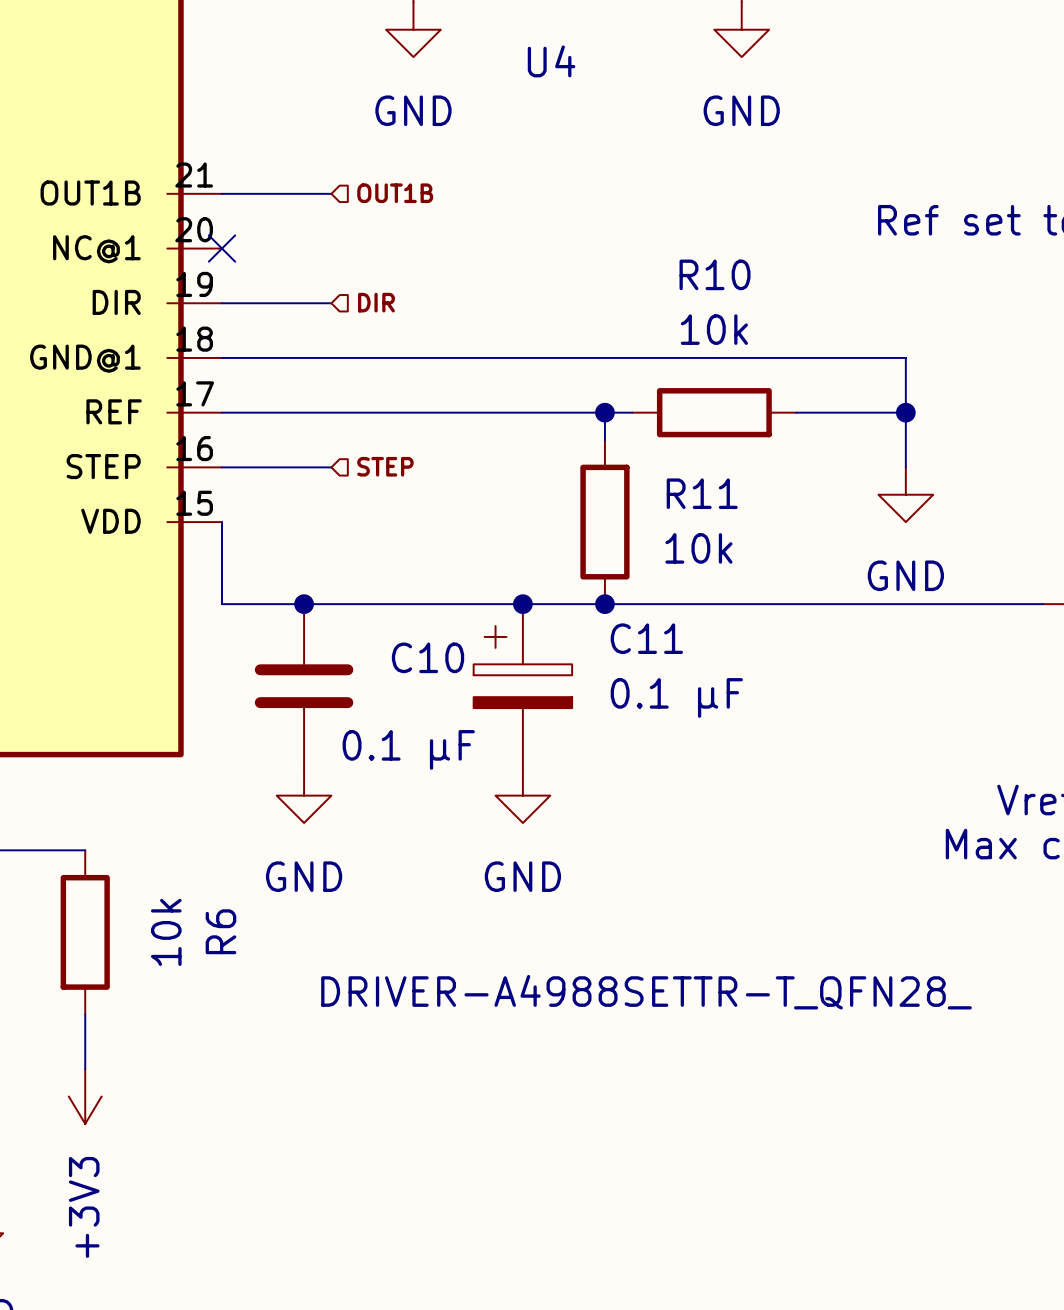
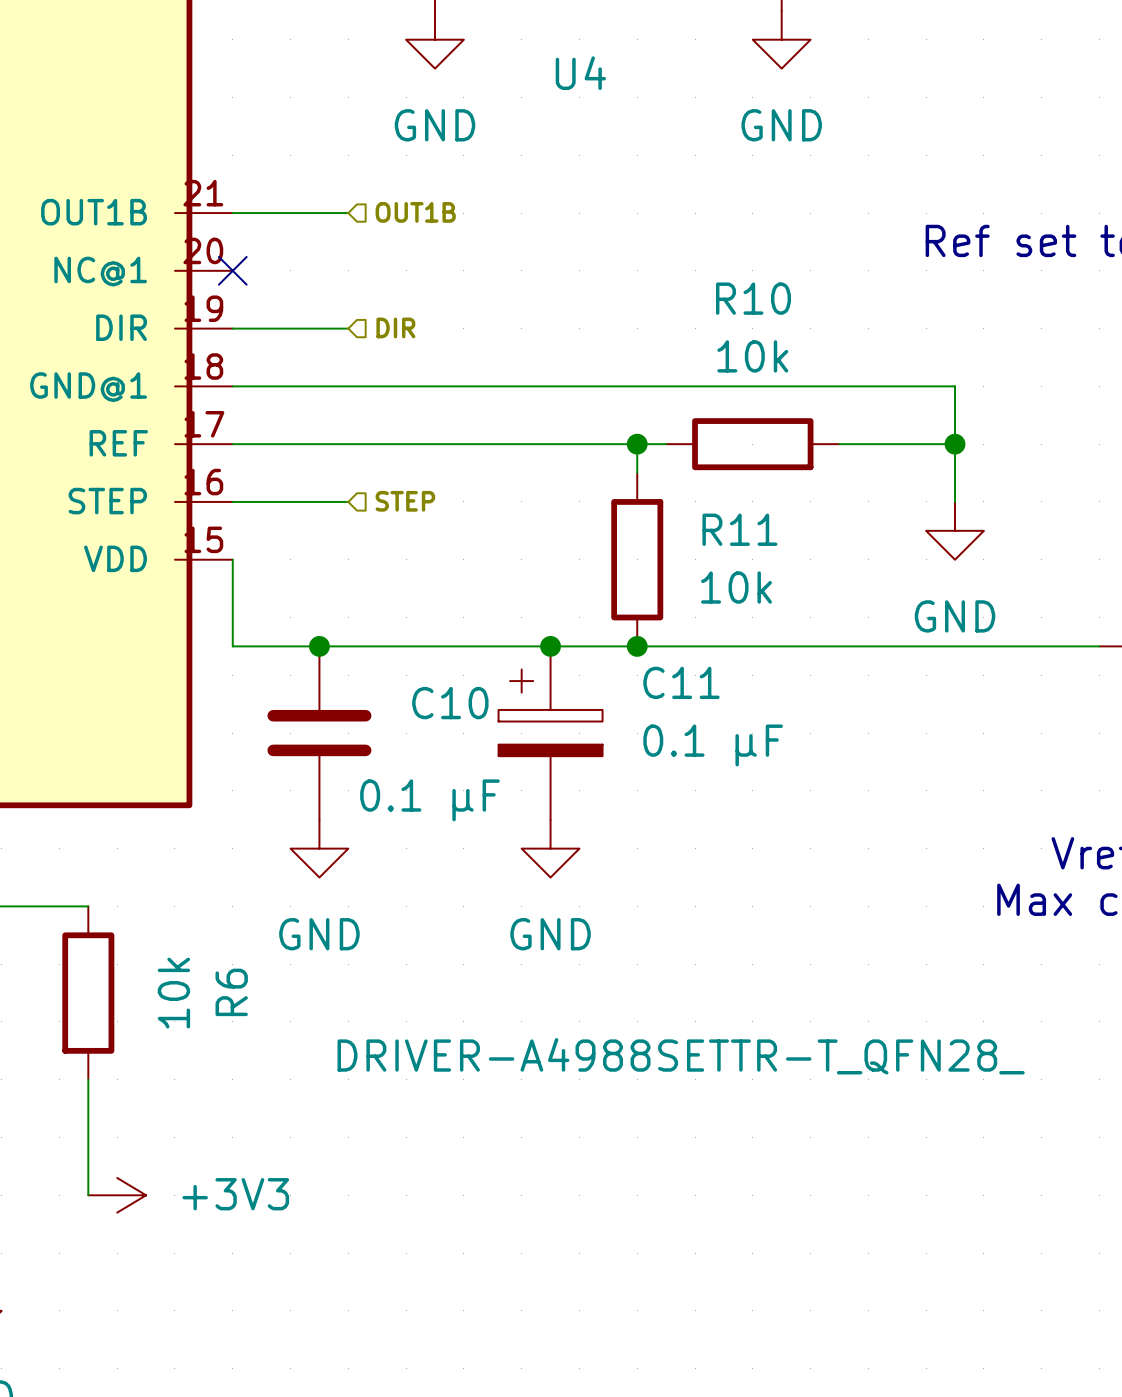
power symbol rotation: 0° (85, 1096) -> 90° counterclockwise (117, 1195)
power symbol position: +3V3 (85, 1096) -> +3V3 (117, 1195)

